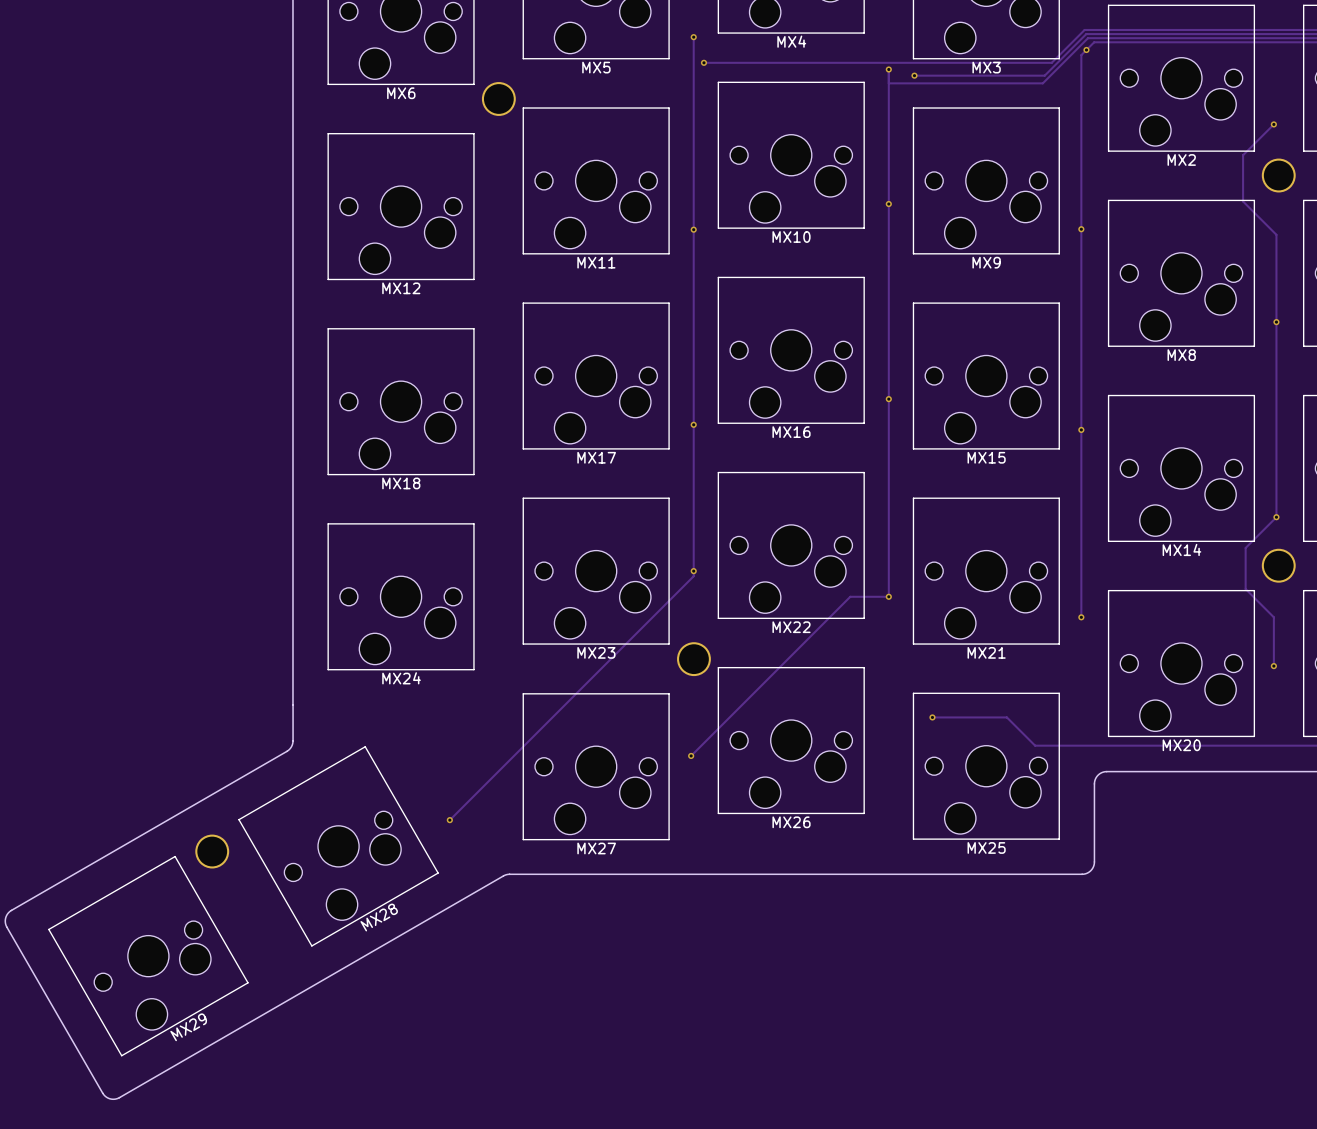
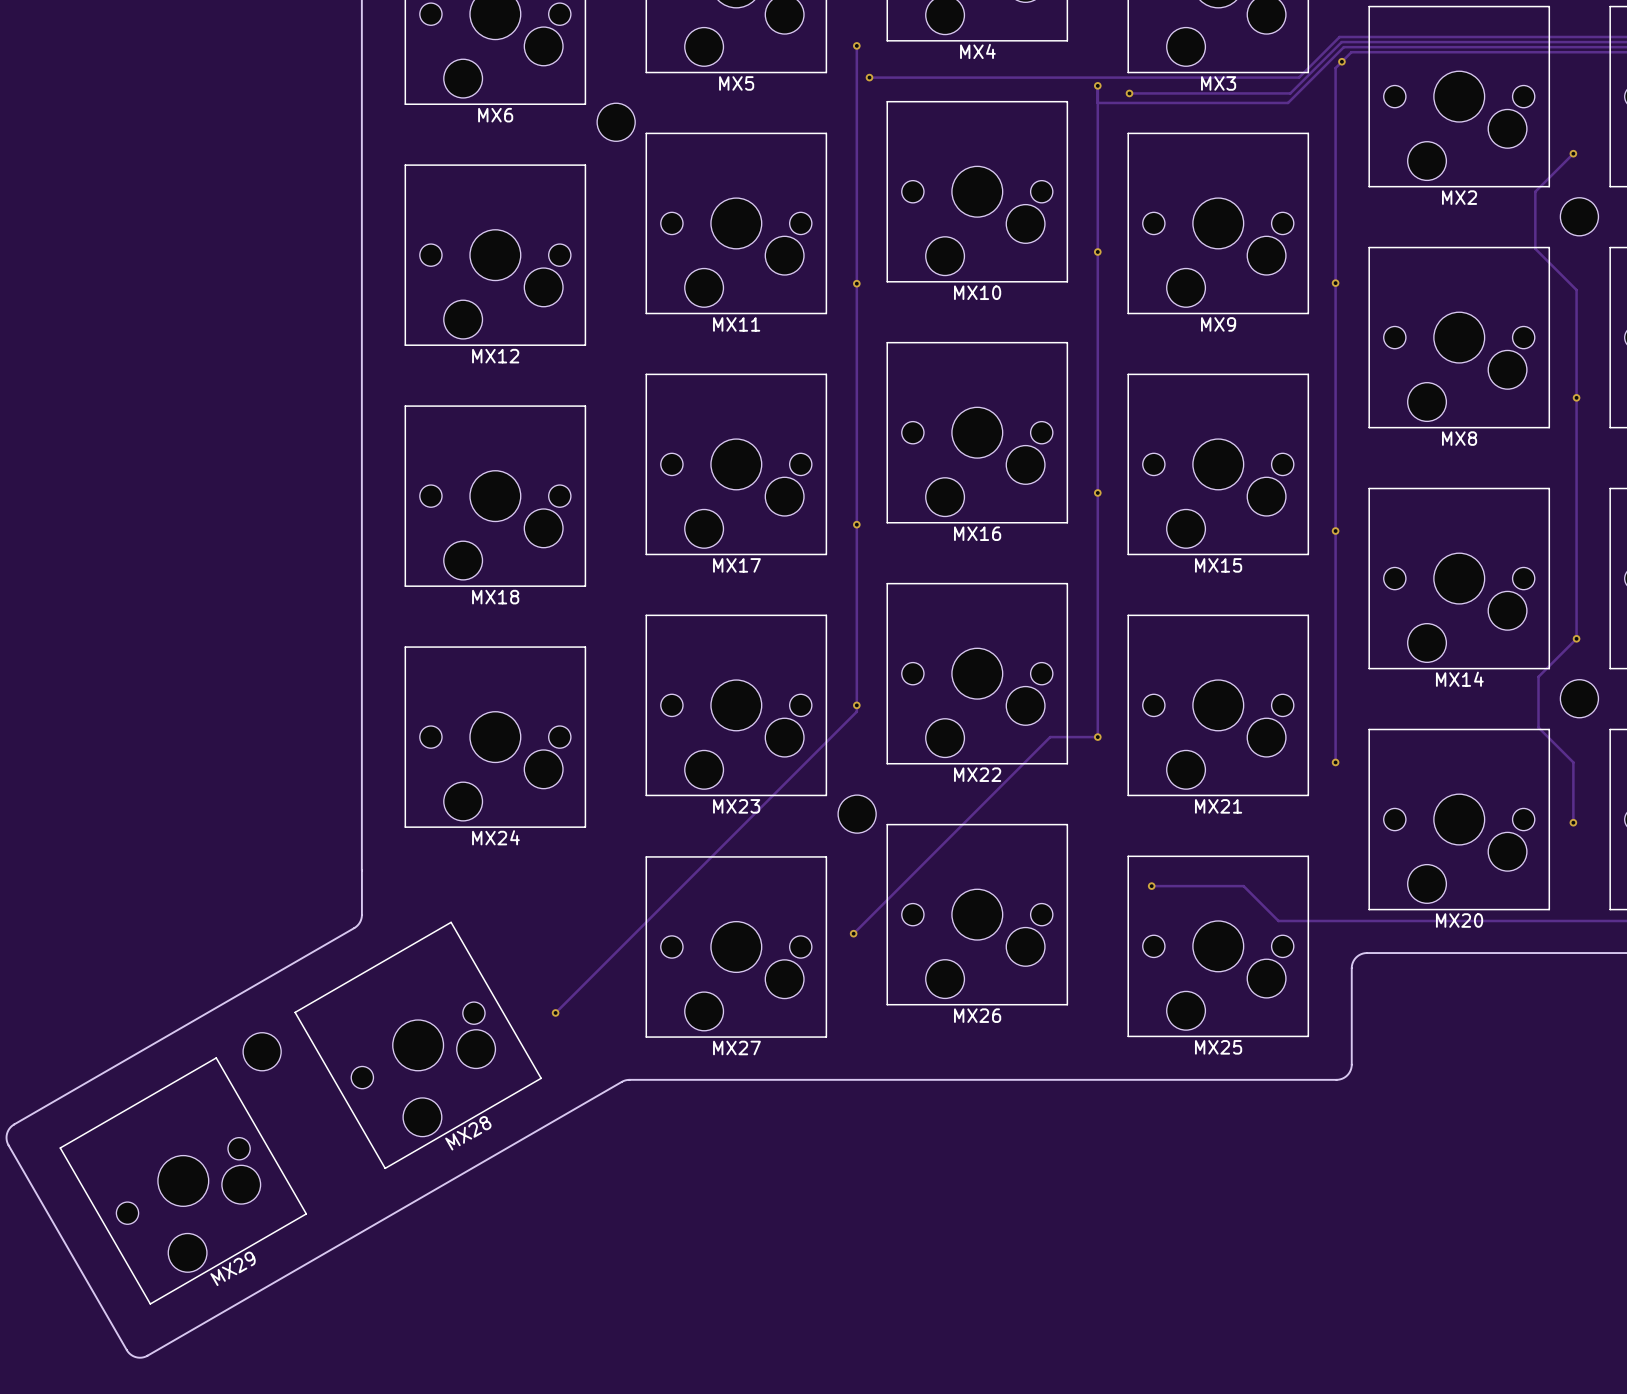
part footprint: [481, 82, 516, 116] -> [597, 103, 636, 142]
part footprint: [1261, 158, 1296, 193] -> [1560, 197, 1599, 236]
part footprint: [1261, 548, 1296, 583] -> [1560, 679, 1599, 718]
part footprint: [677, 642, 711, 677] -> [838, 795, 877, 834]
part footprint: [195, 834, 230, 869] -> [243, 1032, 282, 1071]

